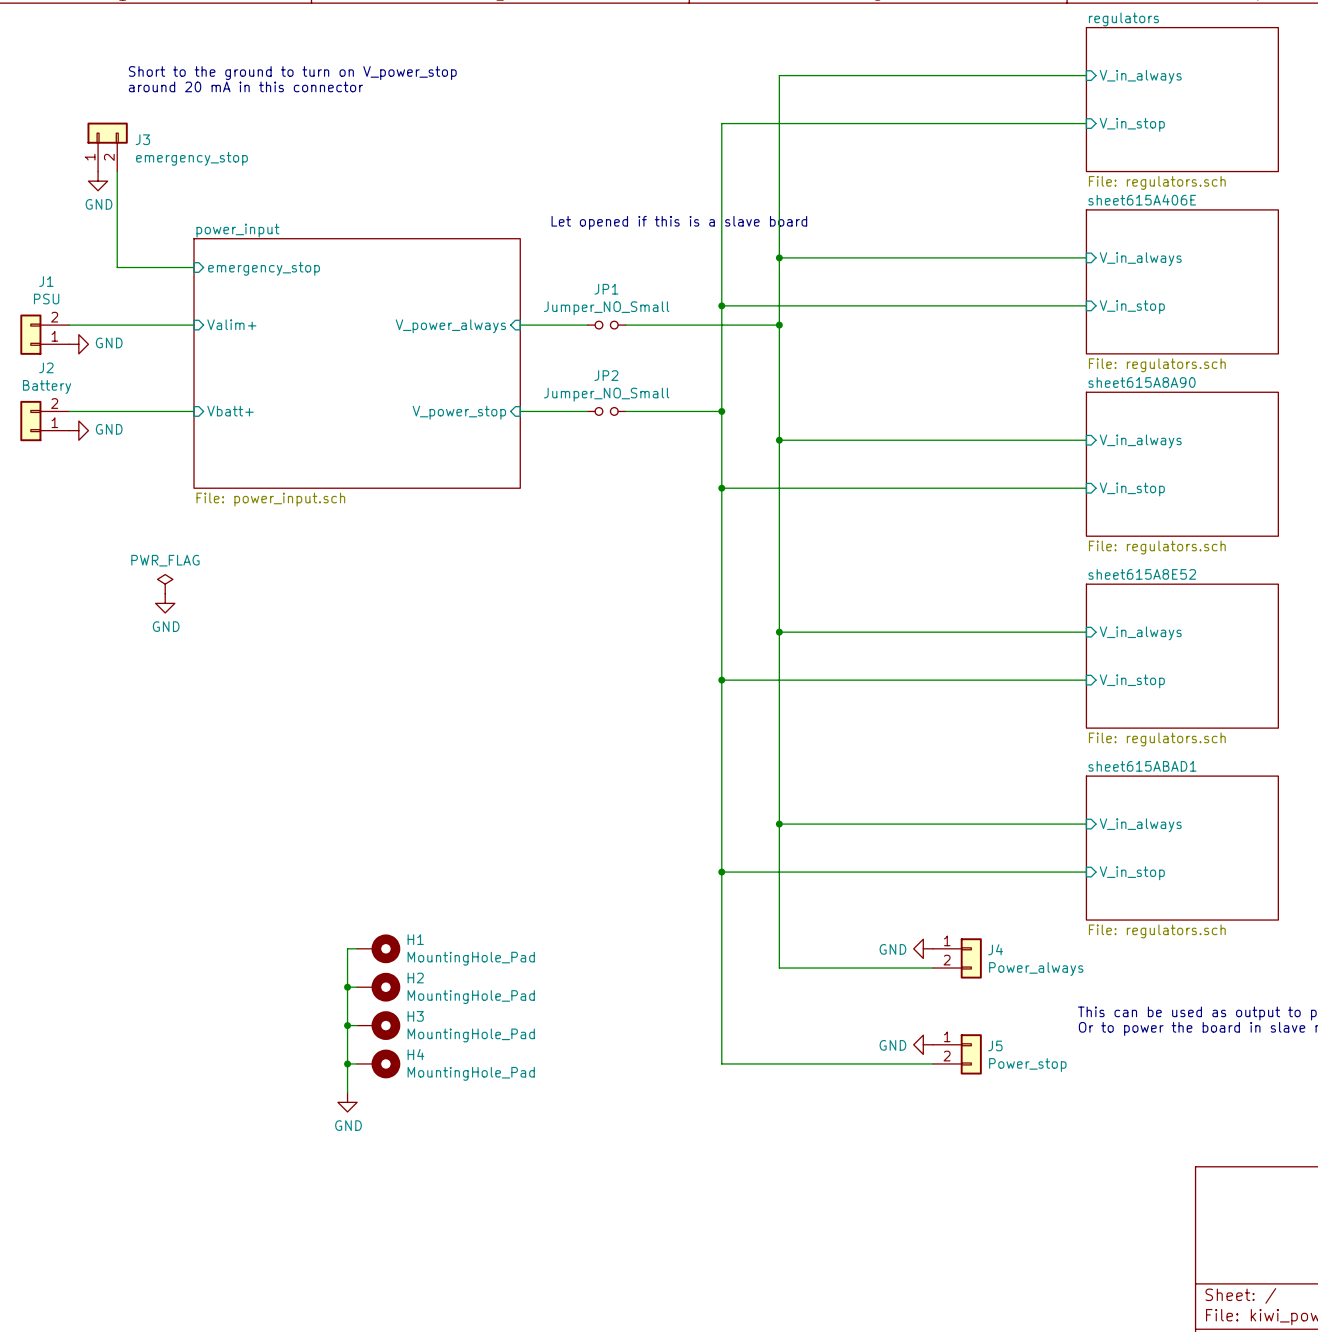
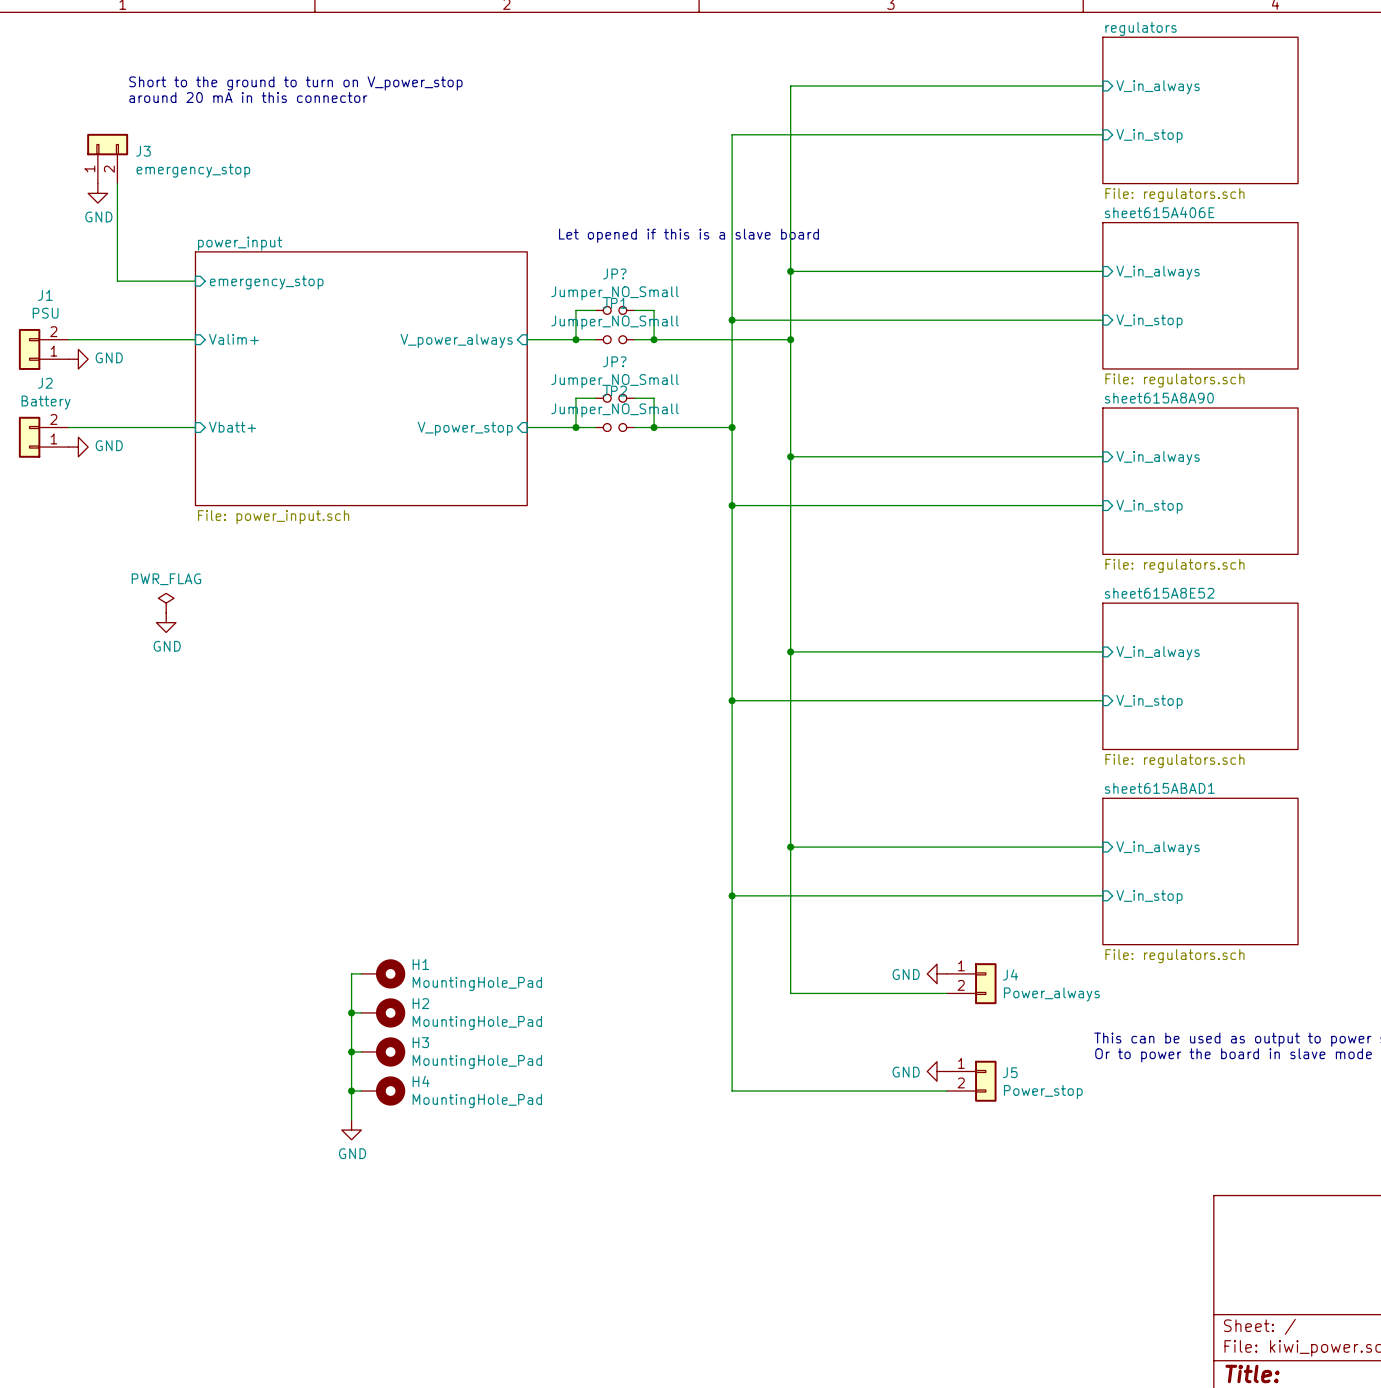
wire: none -> (595, 310) (575, 310) (575, 339)
JP?: none -> Jumper_NO_Small (615, 310)
wire: none -> (634, 310) (654, 310) (654, 339)
junction: none -> (575, 339)
junction: none -> (654, 339)
wire: none -> (595, 398) (575, 398) (575, 427)
JP?: none -> Jumper_NO_Small (615, 398)
wire: none -> (634, 398) (654, 398) (654, 427)
junction: none -> (575, 427)
junction: none -> (654, 427)

